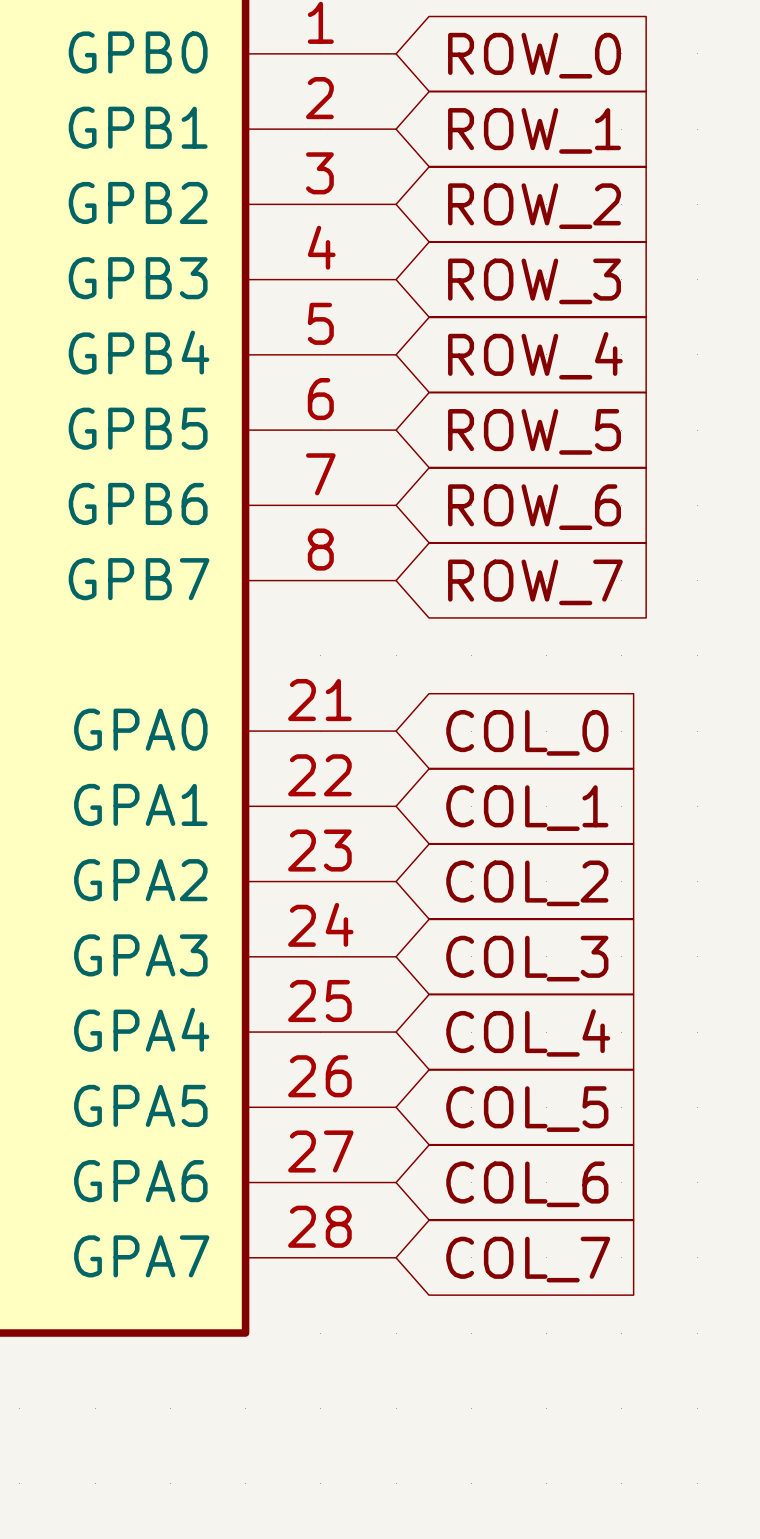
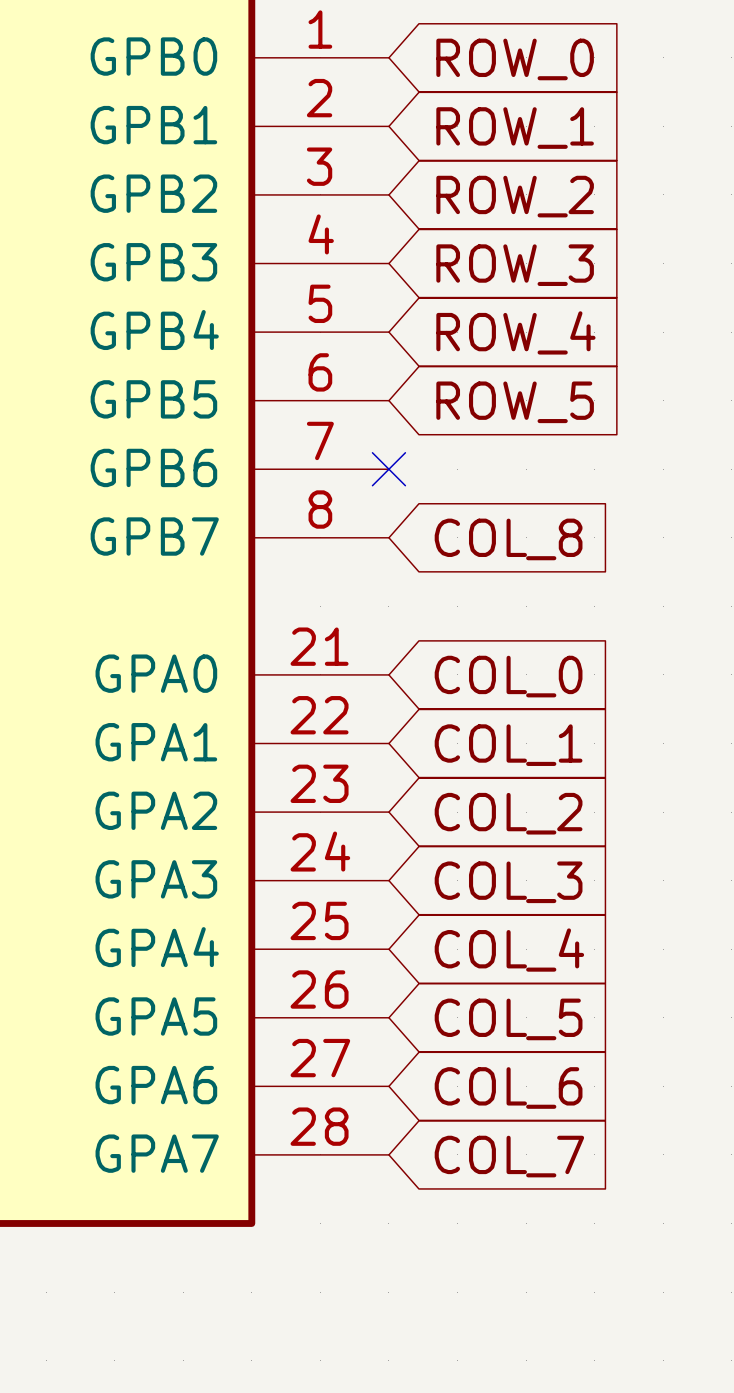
no-connect mark: none -> (388, 469)
global label: ROW_6 (534, 507) -> none
global label: ROW_7 (535, 582) -> COL_8 (508, 539)

